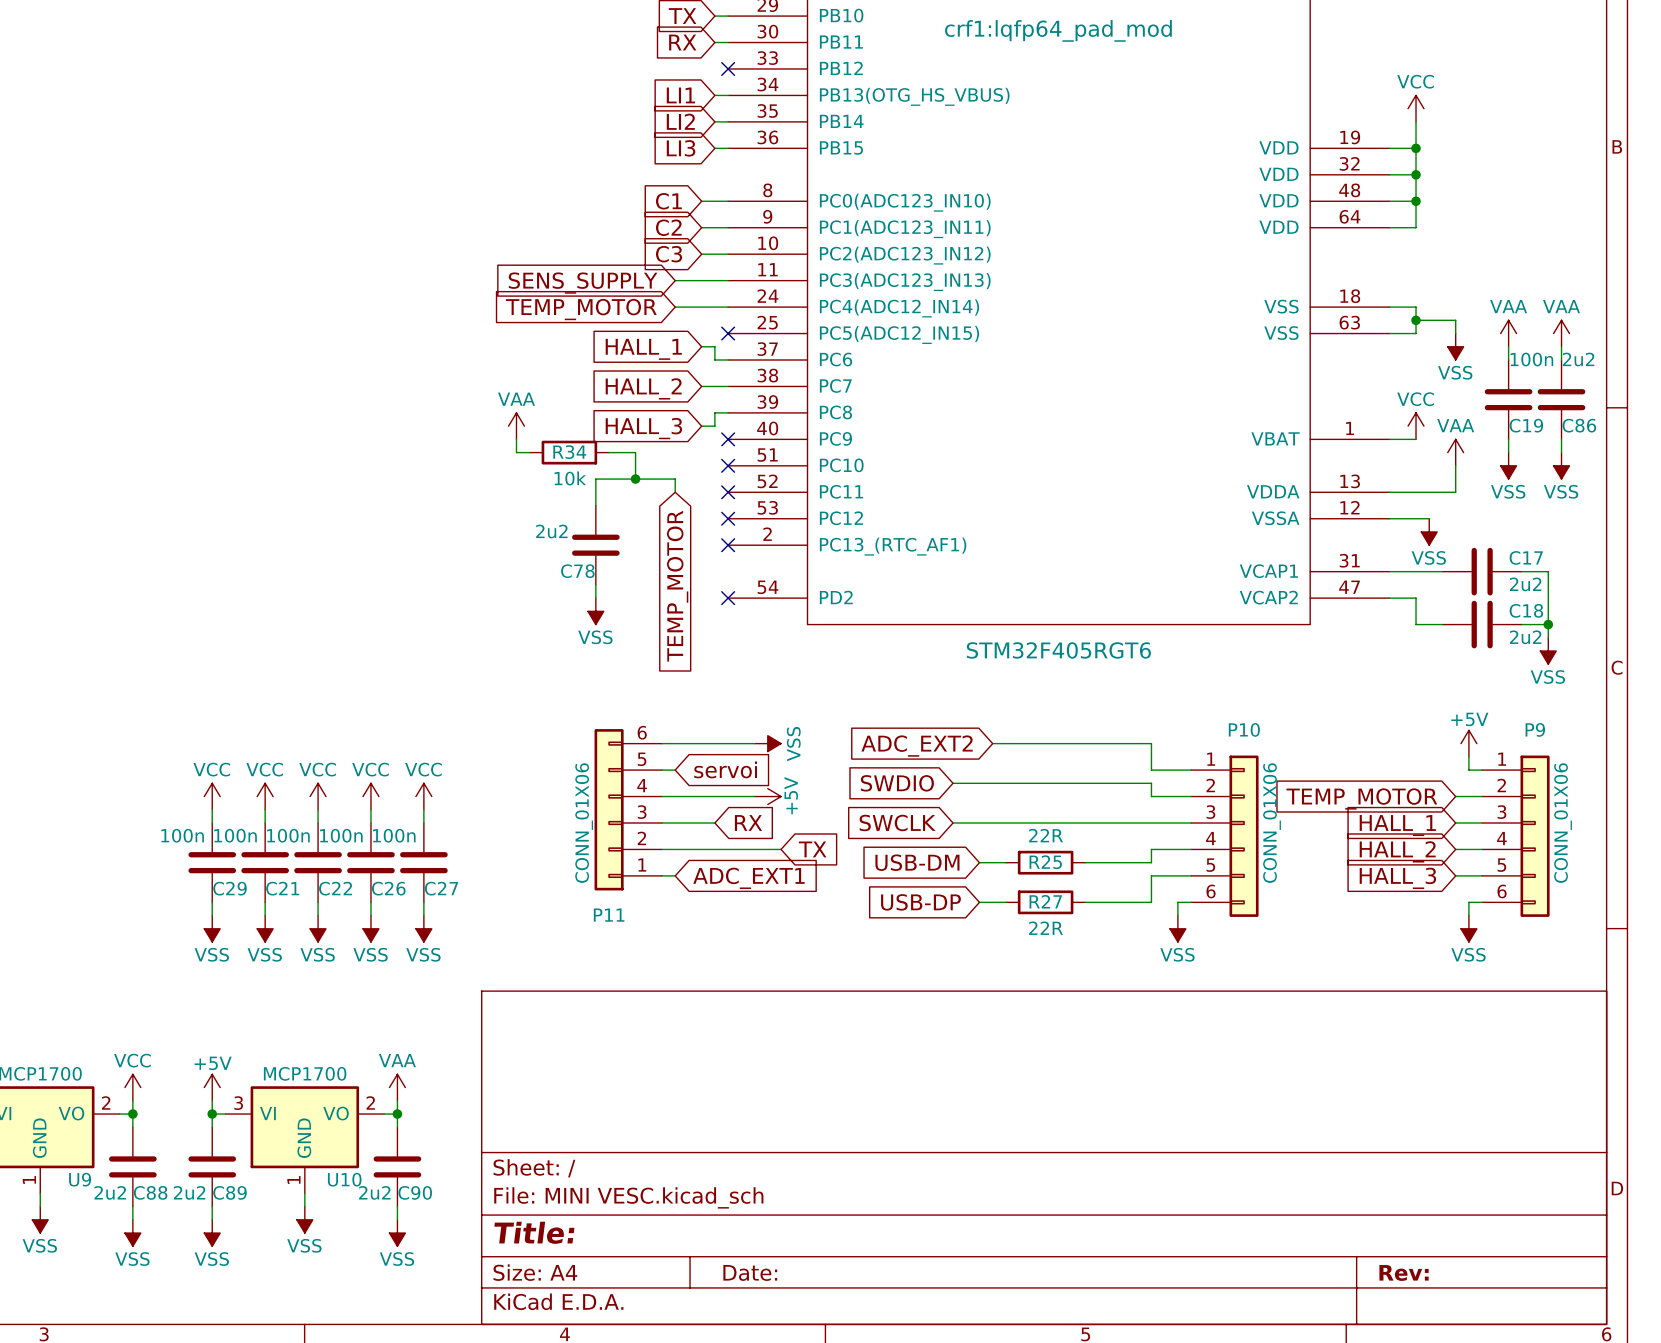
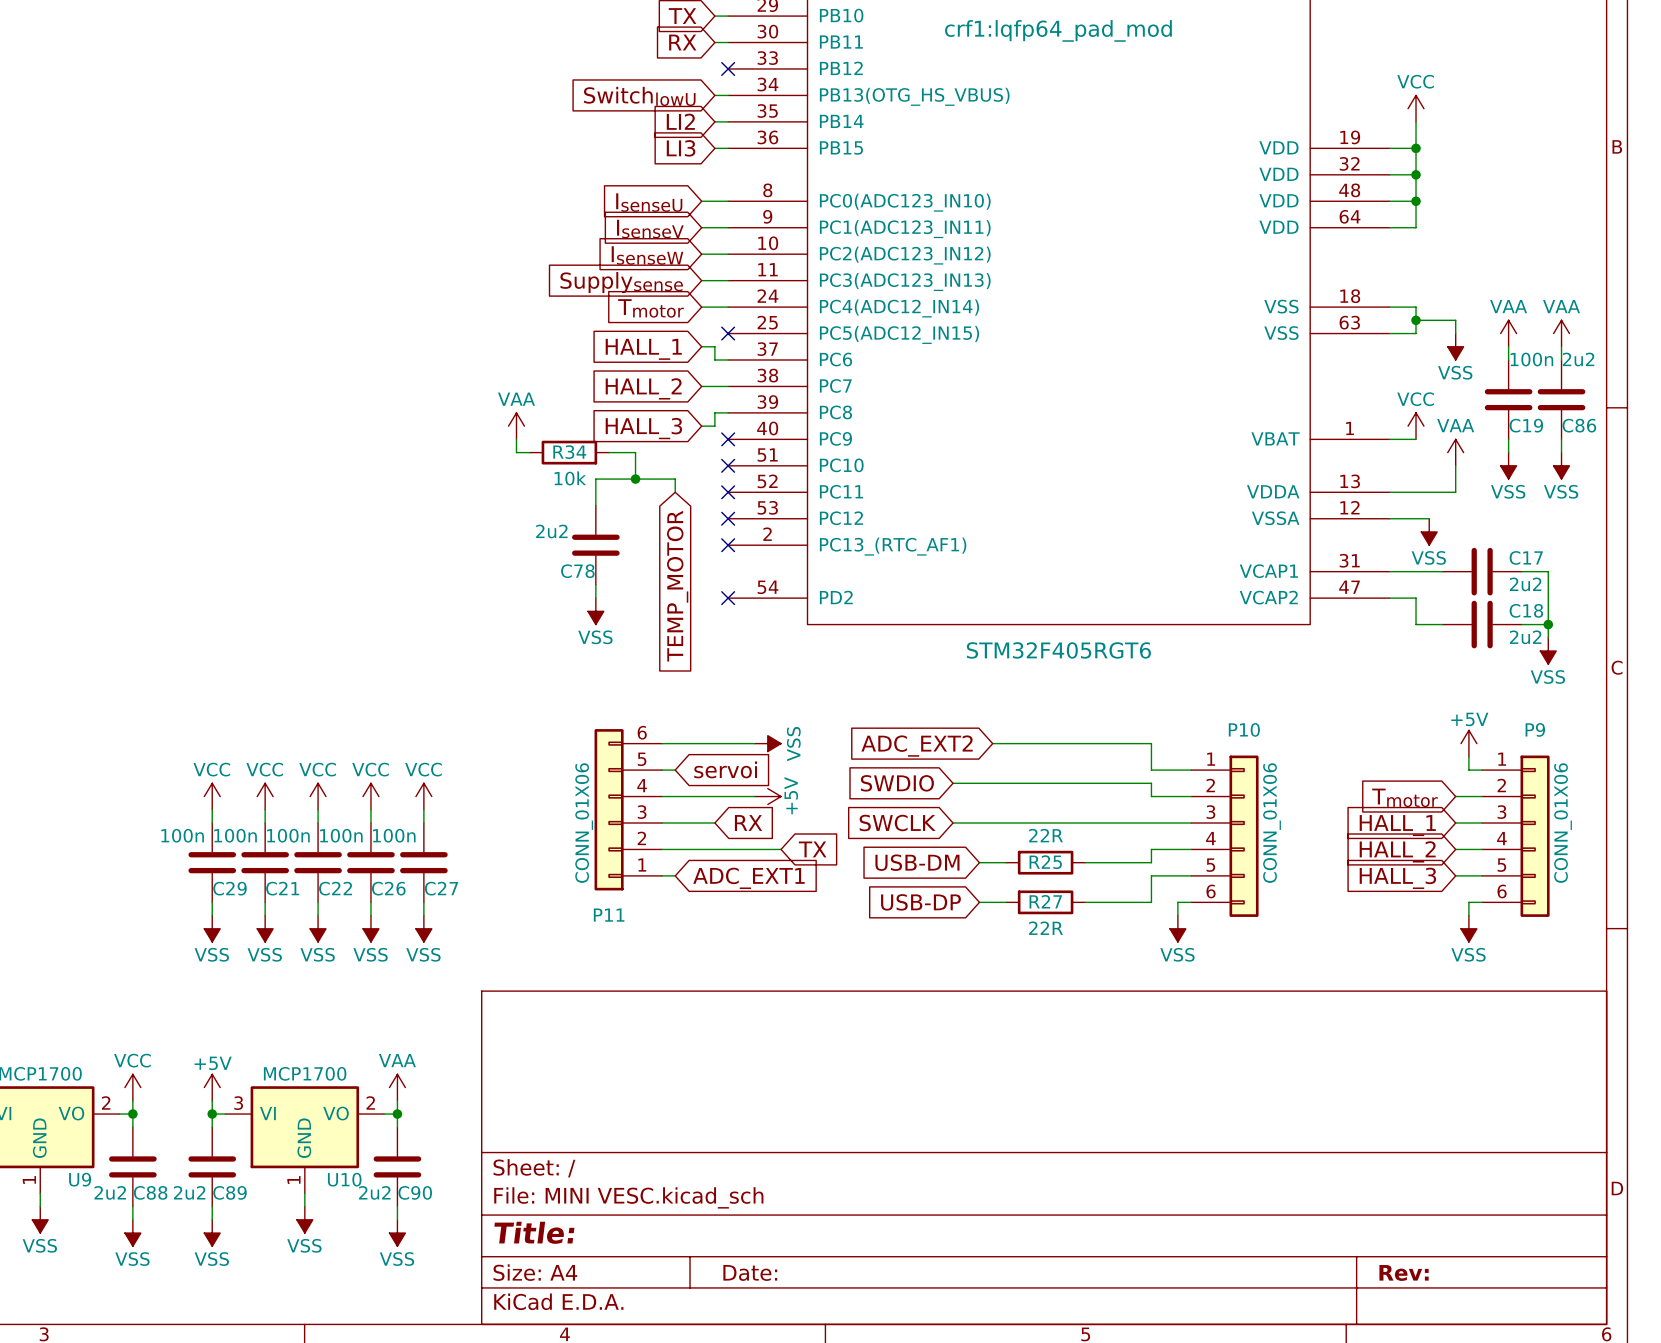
global label: LI1 (680, 95) -> SwitchlowU (639, 96)
global label: C1 (668, 201) -> IsenseU (649, 202)
global label: C2 (668, 227) -> IsenseV (650, 229)
global label: C3 (669, 254) -> IsenseW (647, 255)
wire: (675, 280) (701, 280) -> none
global label: none -> Supplysense (621, 282)
global label: SENS_SUPPLY (583, 283) -> none
wire: (675, 307) (701, 307) -> none
global label: none -> Tmotor (651, 308)
global label: TEMP_MOTOR (581, 309) -> none
global label: TEMP_MOTOR (1361, 798) -> Tmotor (1405, 797)

